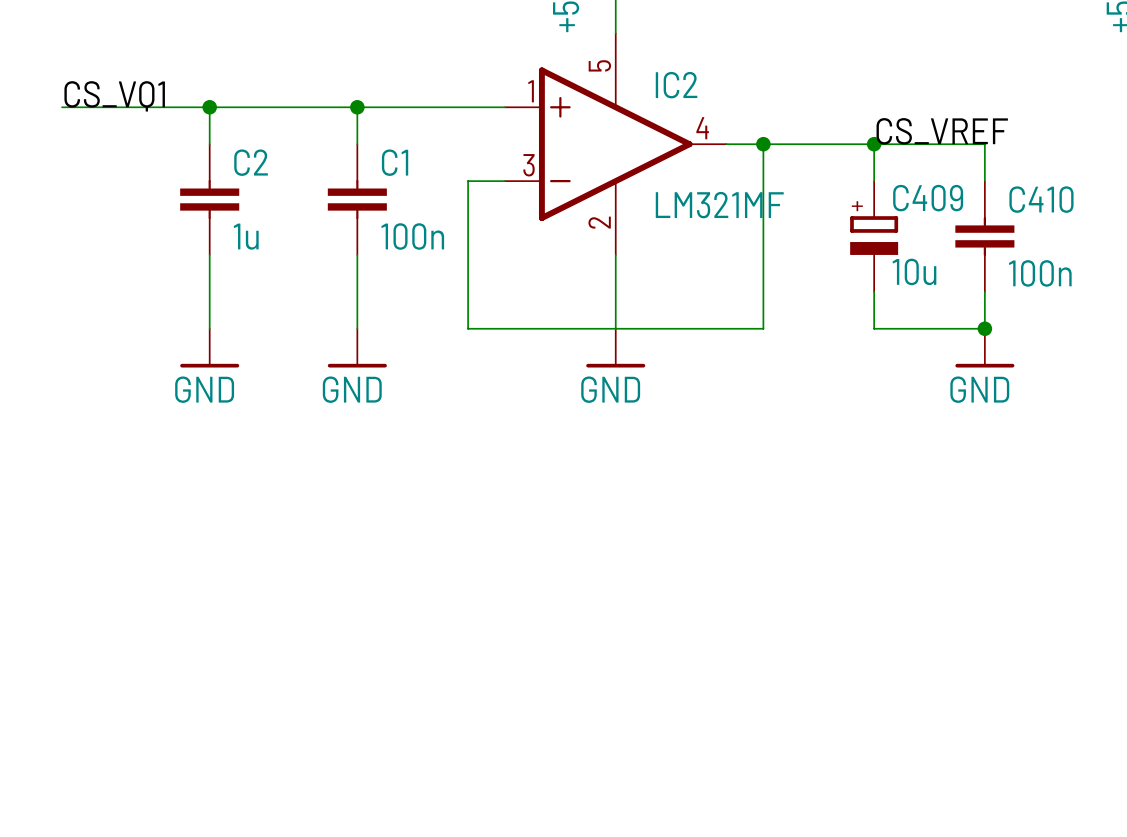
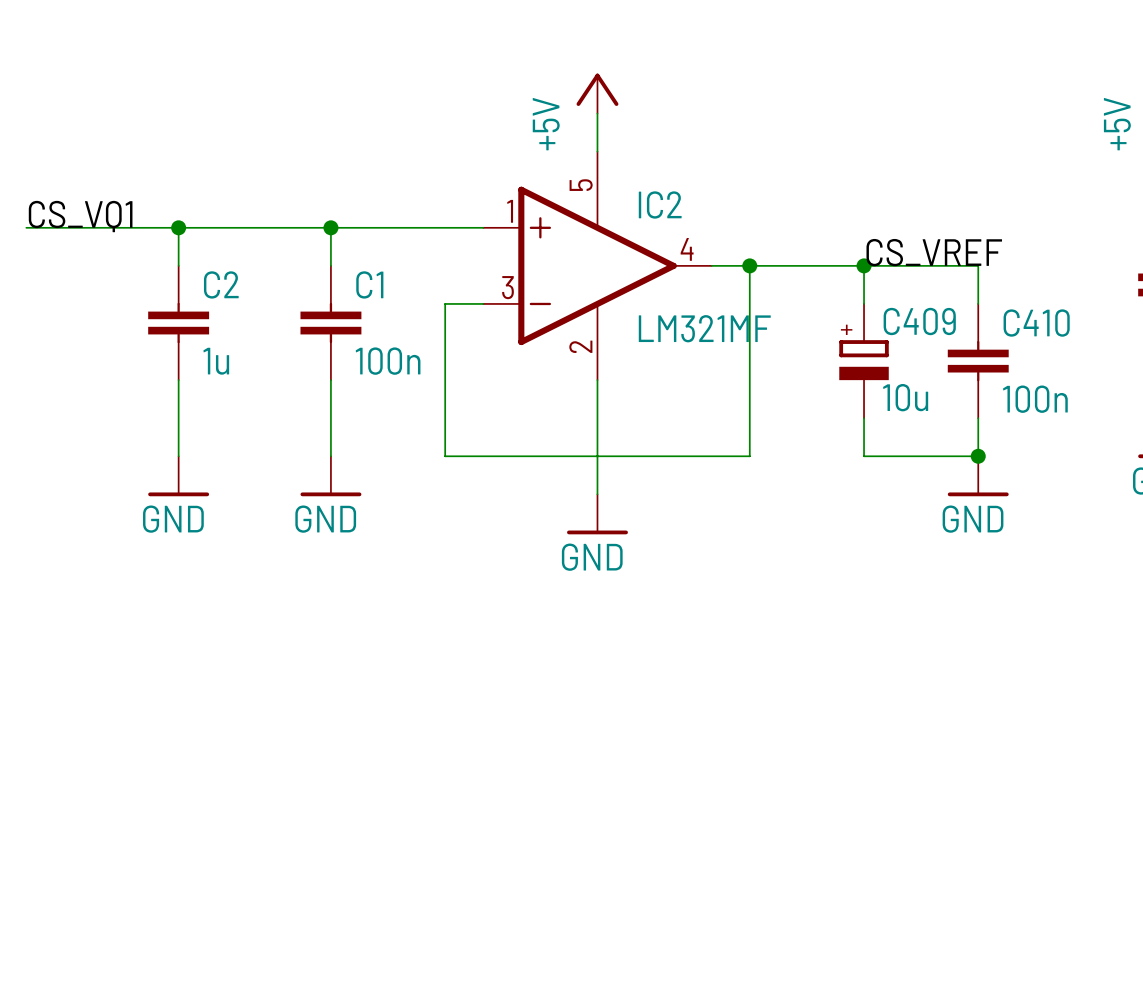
power symbol position: GND (615, 348) -> GND (597, 514)

